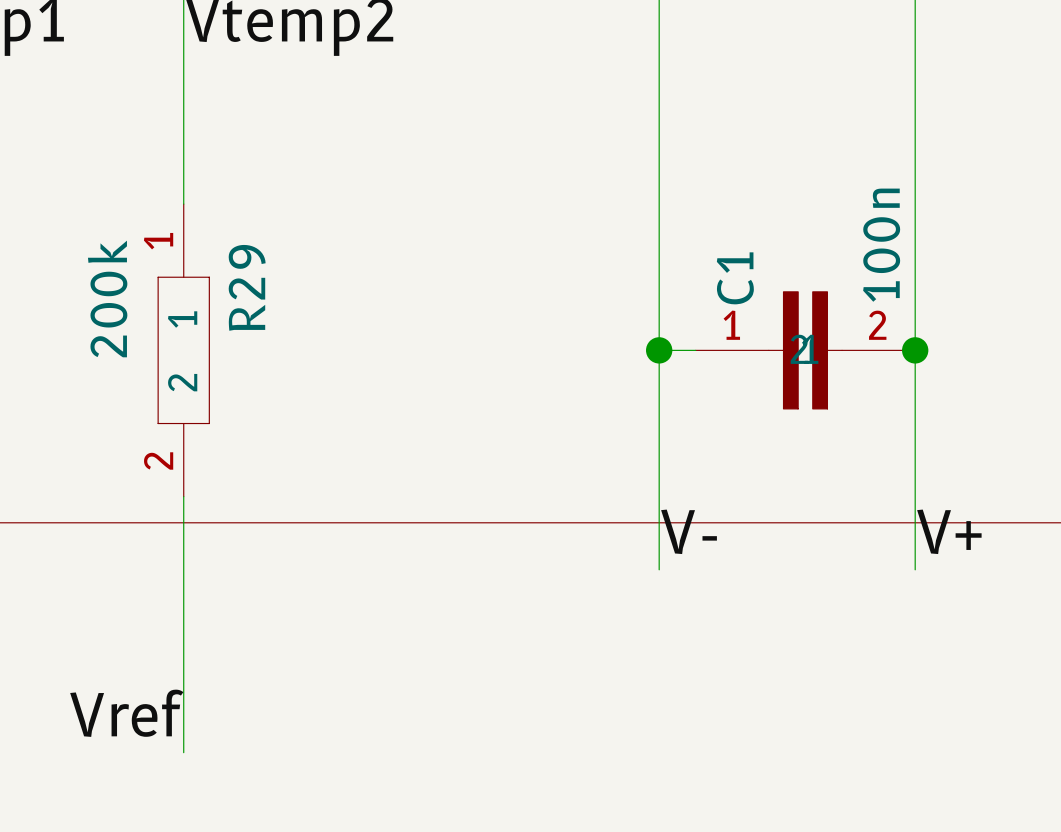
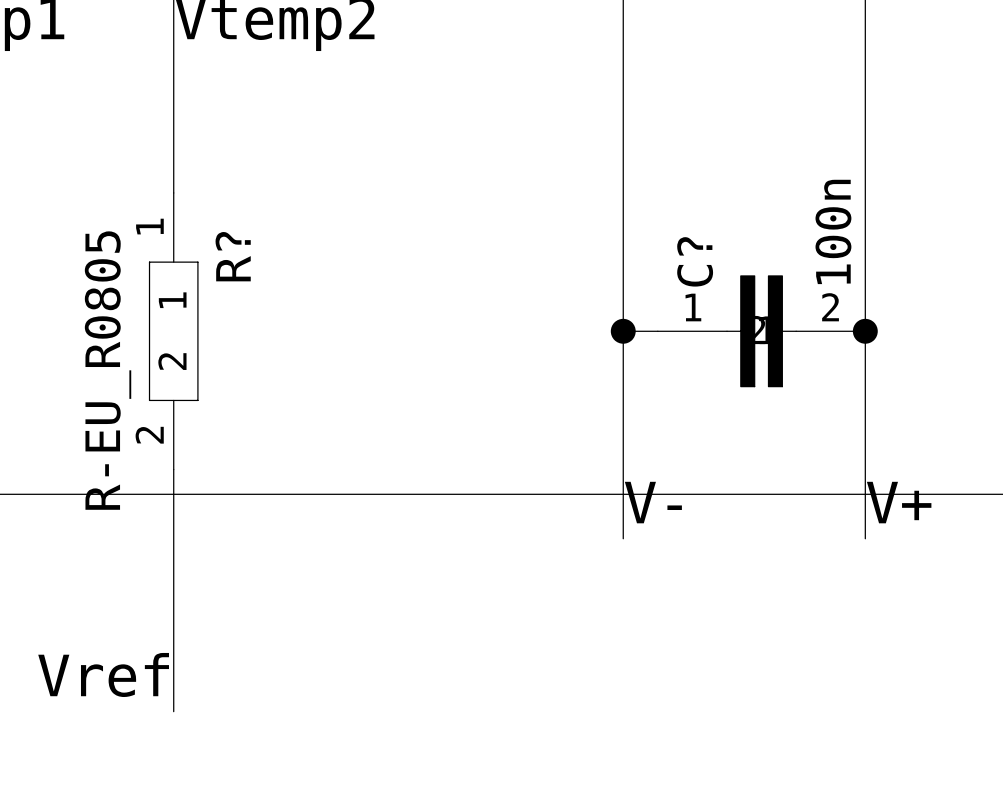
C1 name: C1 (735, 278) -> C? (695, 261)
R29 name: R29 (247, 287) -> R? (233, 256)
R29 value: 200k (107, 298) -> R-EU_R0805 (108, 370)

